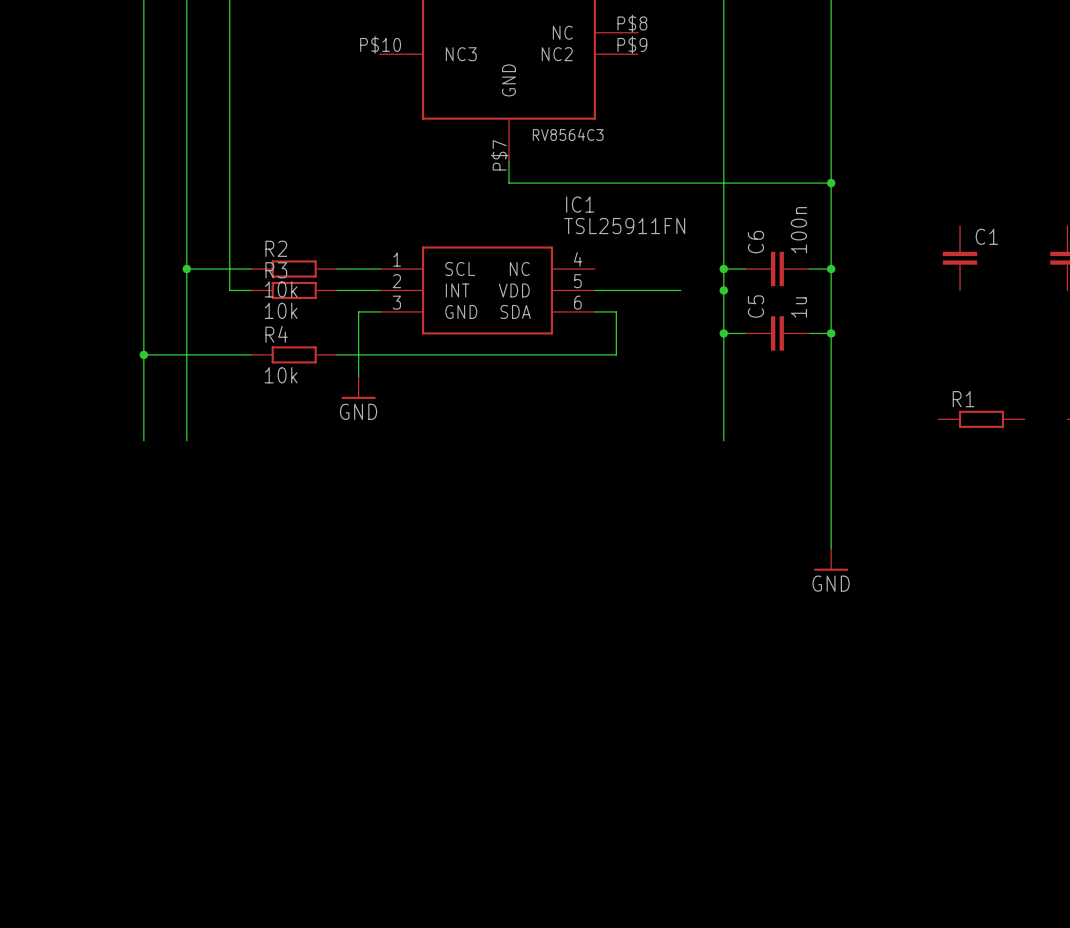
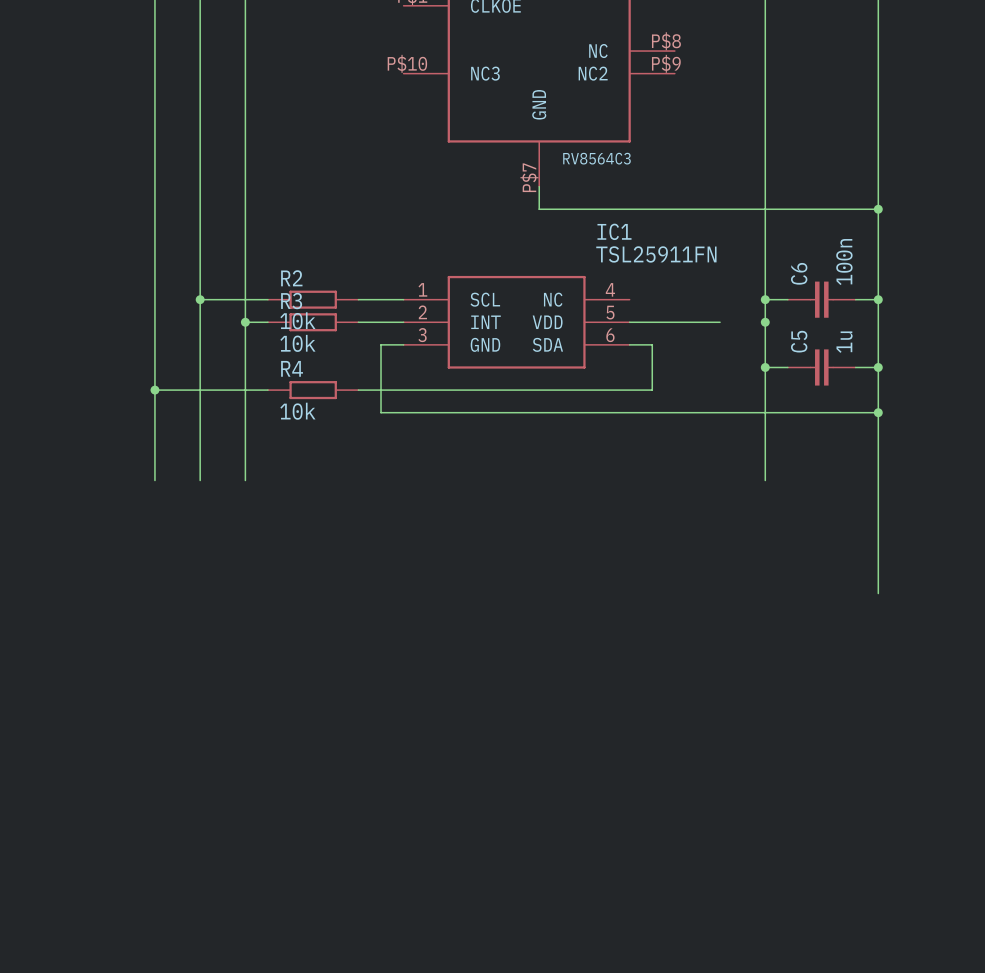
wire: none -> (245, 322) (245, 480)
junction: none -> (245, 322)
wire: none -> (381, 412) (878, 412)
junction: none -> (878, 412)
power symbol: GND (358, 387) -> none
power symbol: GND (831, 559) -> none

